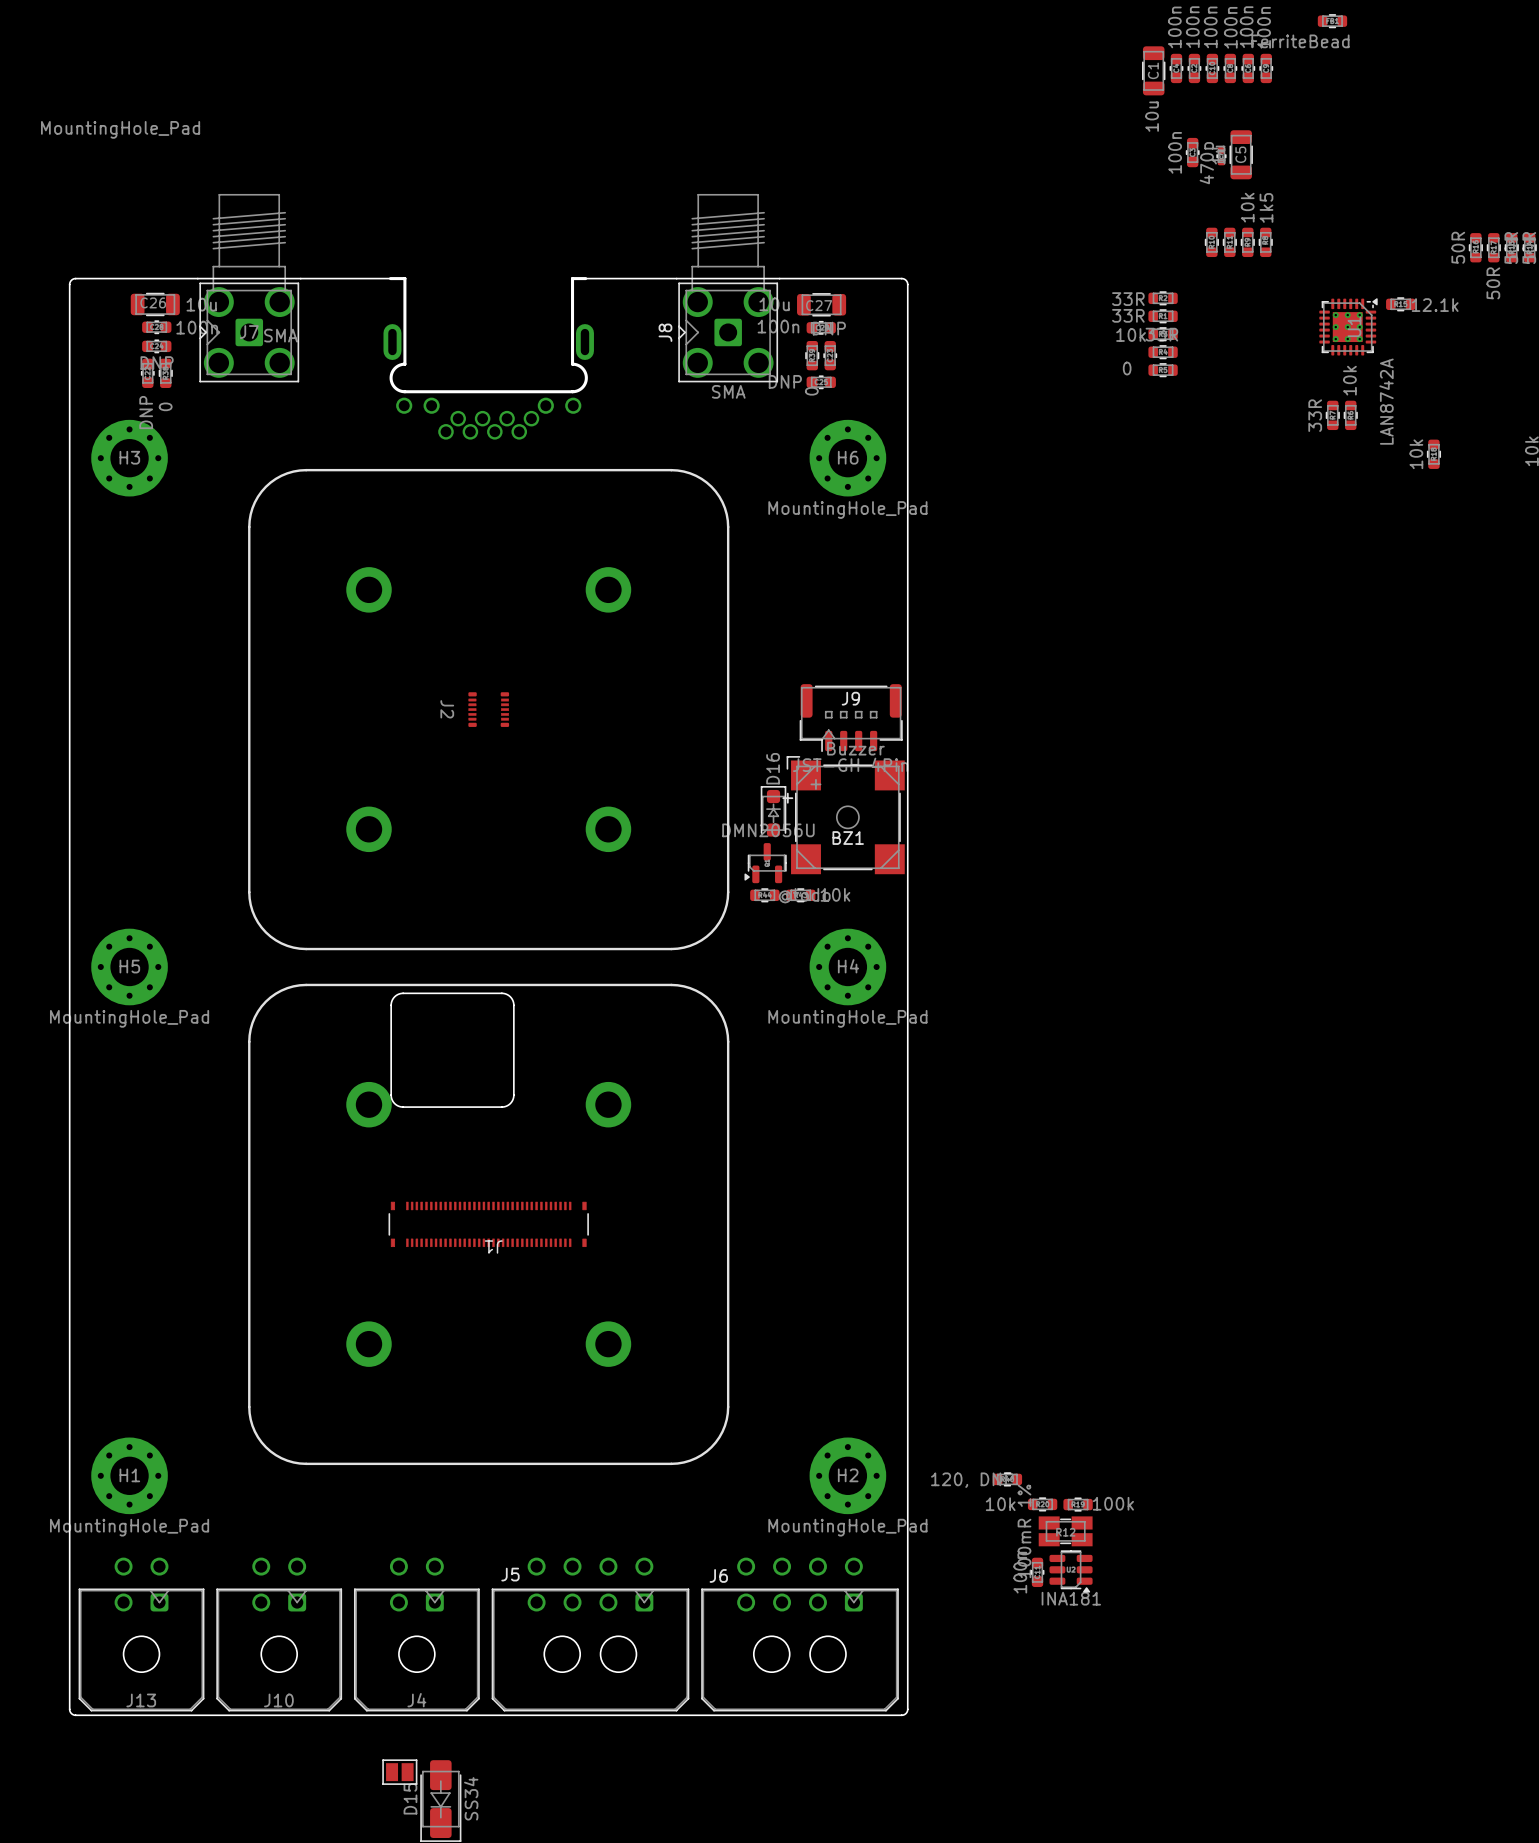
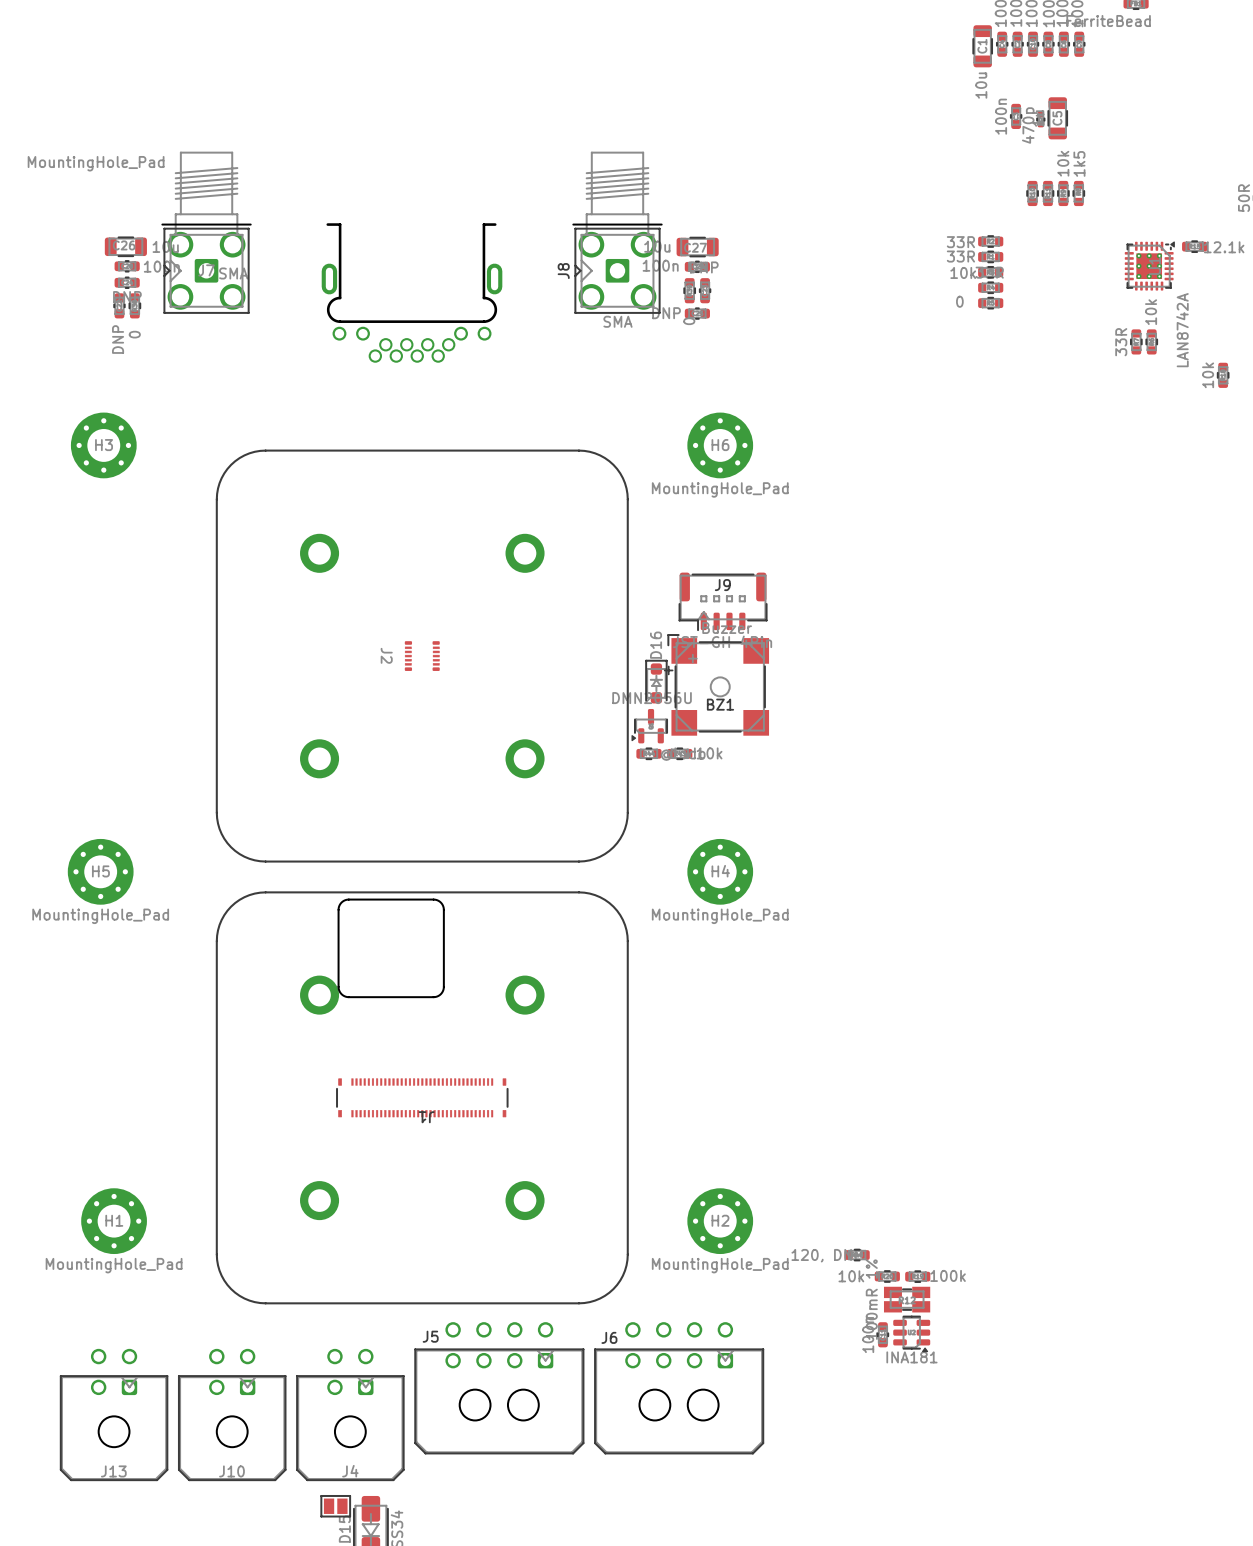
board edge: (197, 278) (75, 278) (69, 283) (69, 1709) (74, 1715) (901, 1715) (907, 1711) (907, 283) (901, 278) (779, 278) -> none
board edge: (300, 278) (390, 278) -> none
board edge: (585, 278) (676, 278) -> none
H3 position: (129, 458) -> (103, 445)
H6 position: (847, 458) -> (720, 445)
J2 position: (488, 709) -> (422, 656)
H5 position: (129, 967) -> (100, 871)
H4 position: (847, 967) -> (720, 871)
J1 position: (488, 1224) -> (422, 1097)
H1 position: (129, 1475) -> (114, 1221)
H2 position: (847, 1475) -> (720, 1221)
J13 position: (141, 1634) -> (114, 1414)
J10 position: (279, 1634) -> (232, 1414)
J4 position: (416, 1634) -> (350, 1414)

